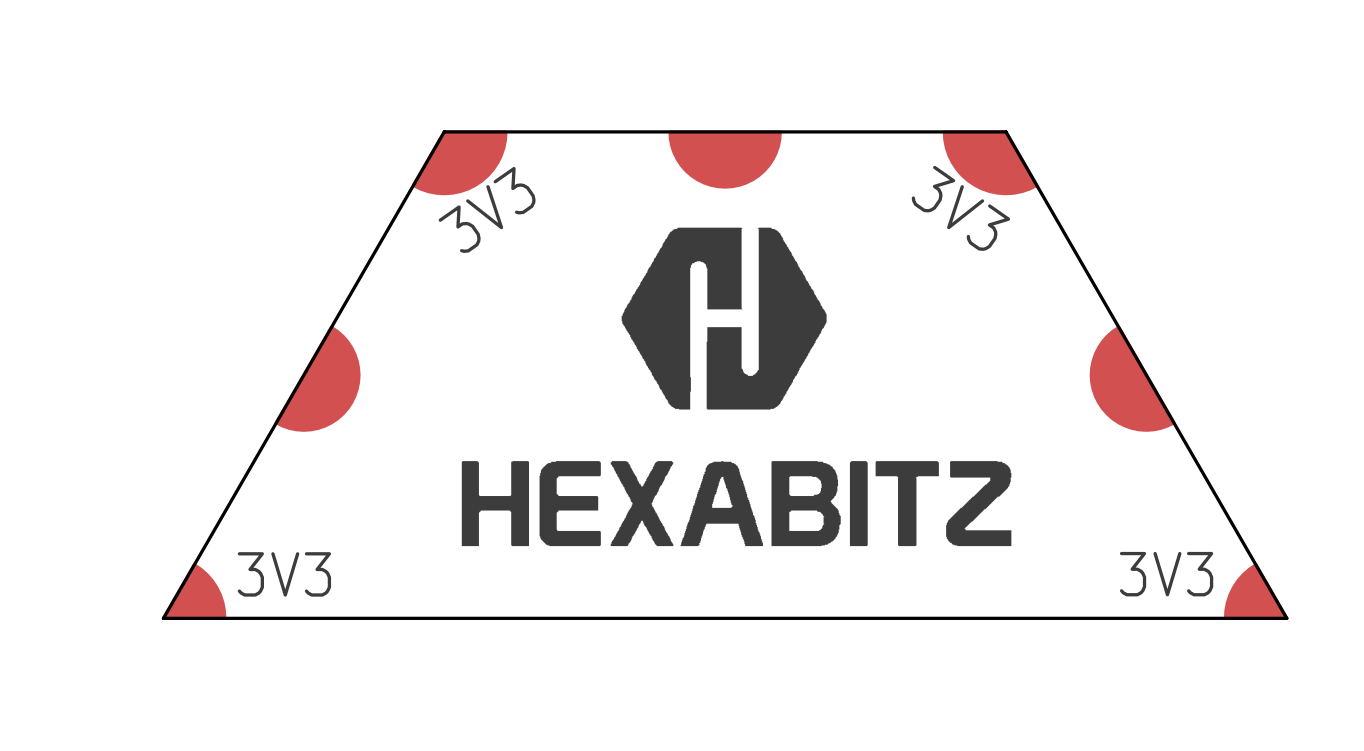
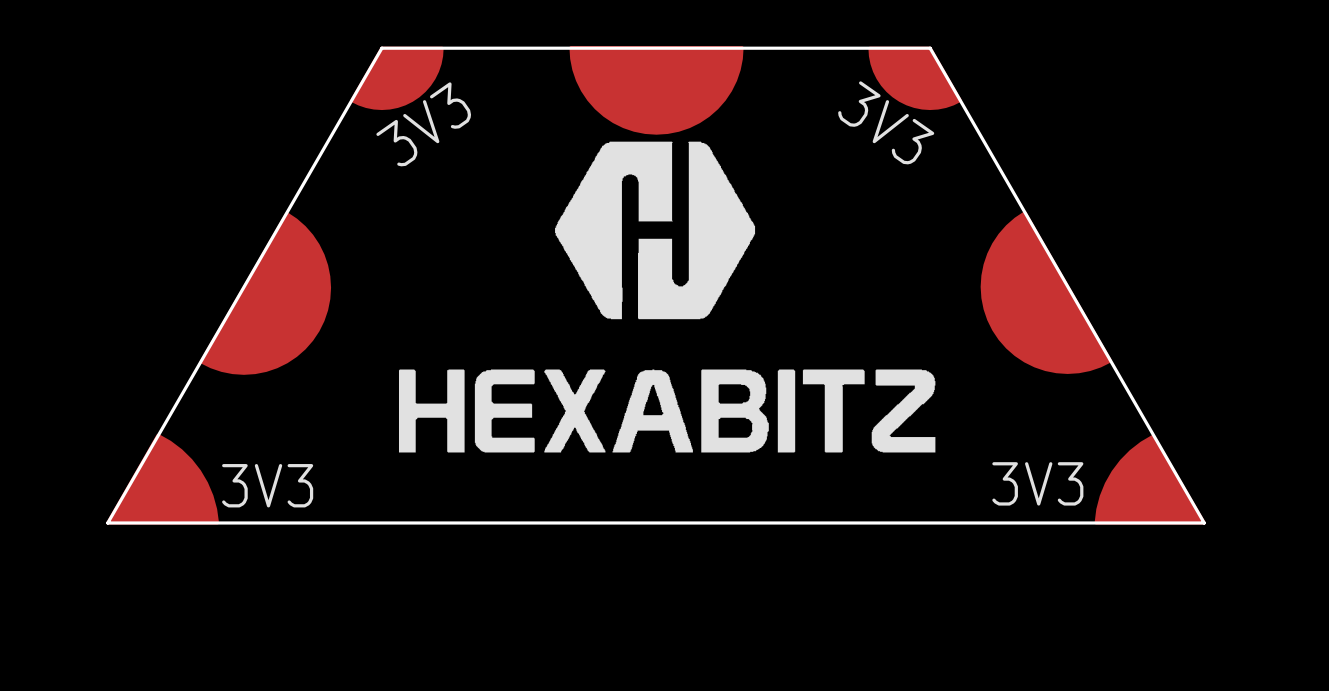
part footprint: [161, 130, 1289, 620] -> [106, 45, 1206, 525]
text position: 3V3 (284, 574) -> 3V3 (267, 485)
text position: 3V3 (1166, 574) -> 3V3 (1037, 483)

